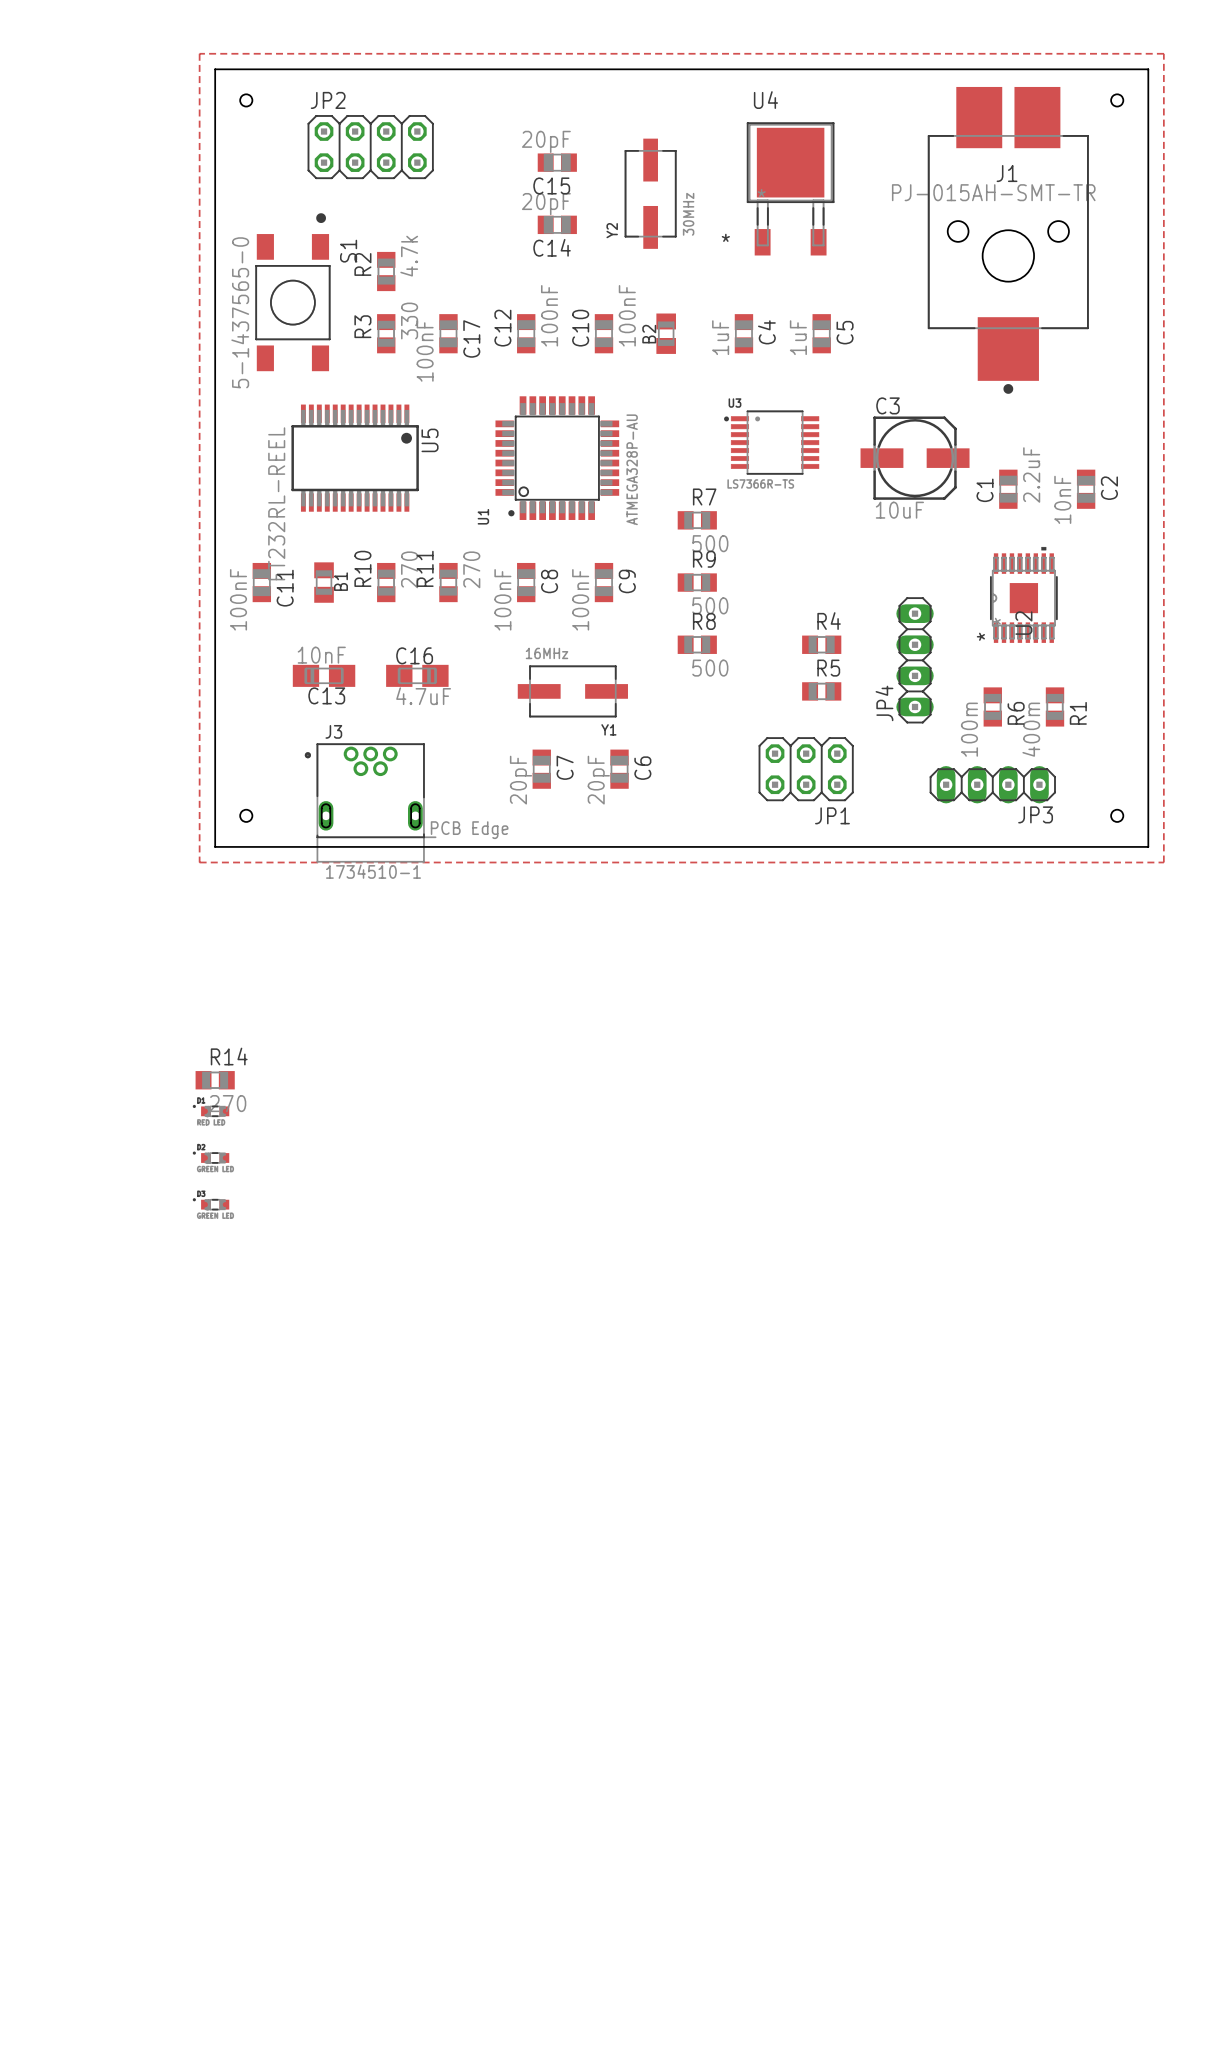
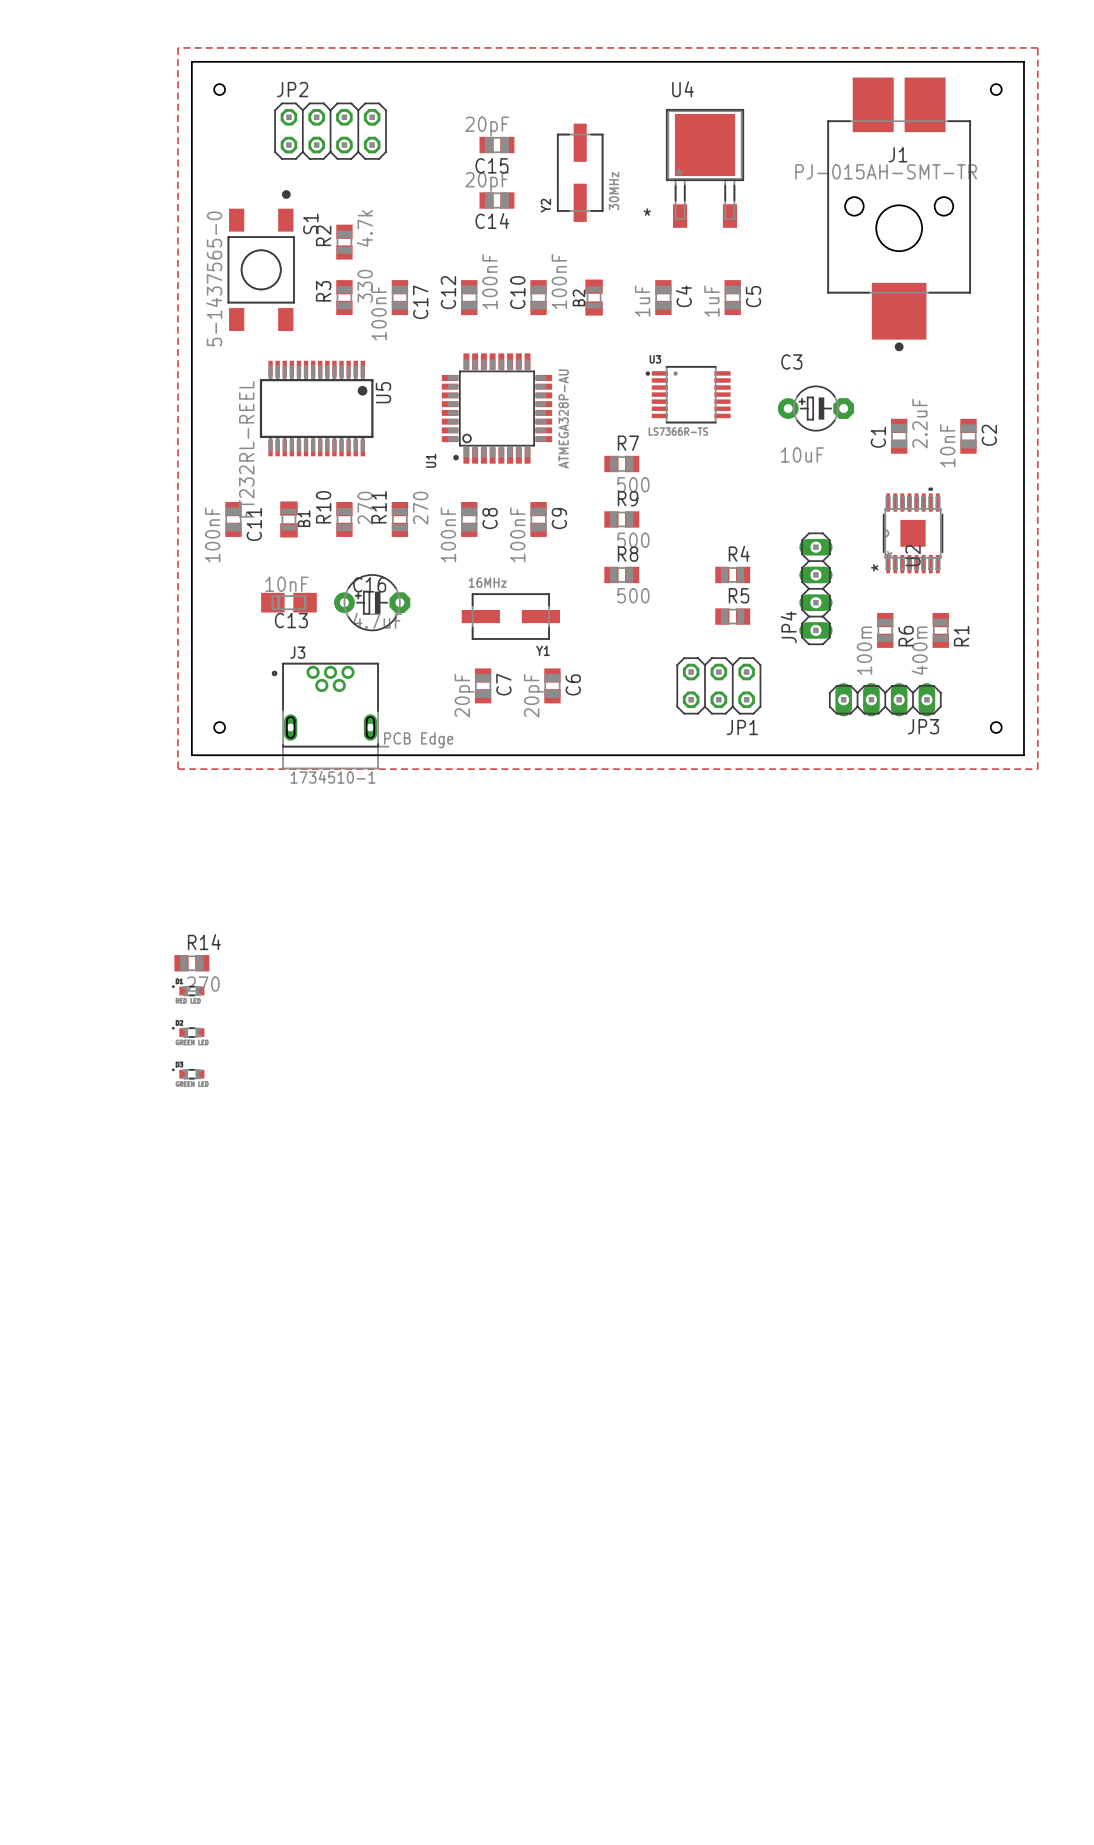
C3 footprint: [860, 416, 970, 500] -> [777, 385, 855, 432]
C16 footprint: [386, 664, 449, 687] -> [334, 574, 411, 632]

